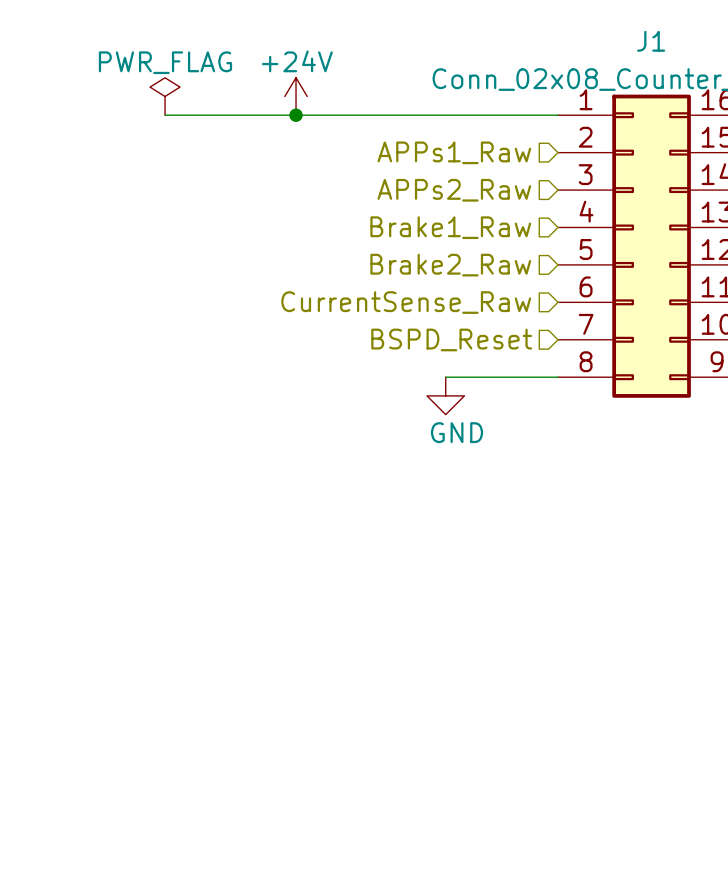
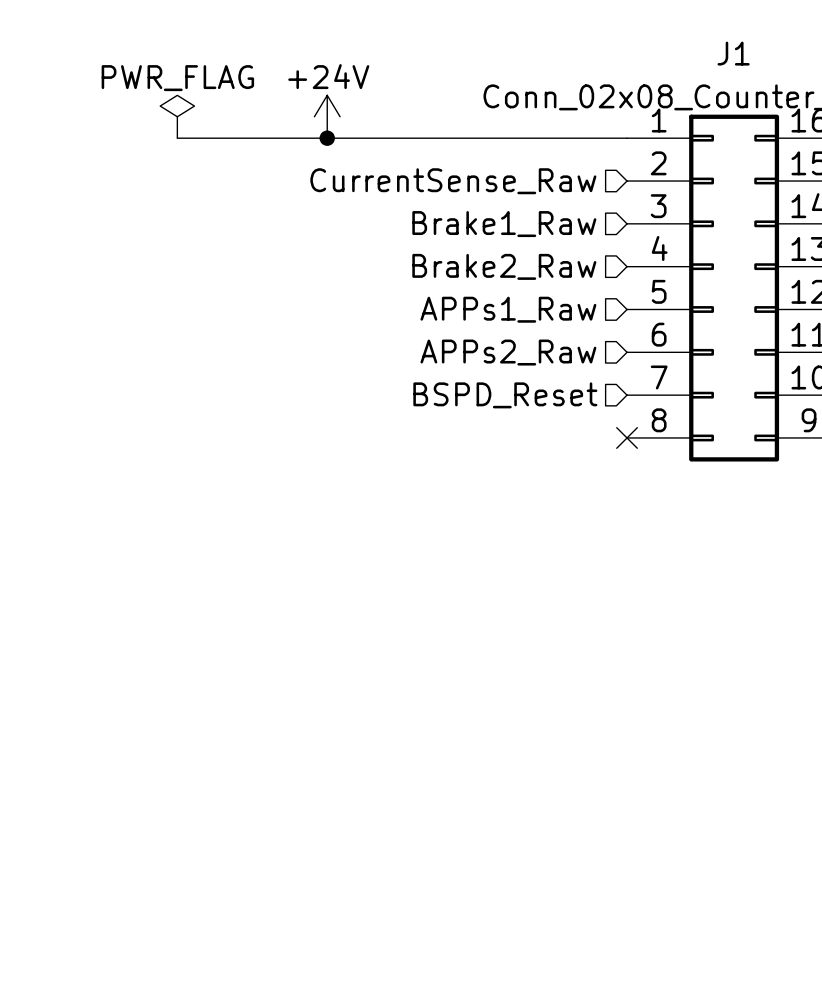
hierarchical label: APPs1_Raw (454, 152) -> CurrentSense_Raw (453, 181)
hierarchical label: APPs2_Raw (454, 190) -> Brake1_Raw (504, 224)
hierarchical label: Brake1_Raw (450, 227) -> Brake2_Raw (504, 266)
hierarchical label: Brake2_Raw (450, 265) -> APPs1_Raw (508, 309)
hierarchical label: CurrentSense_Raw (406, 302) -> APPs2_Raw (508, 352)
wire: (445, 377) (558, 377) -> none
no-connect mark: none -> (627, 437)
power symbol: GND (445, 395) -> none

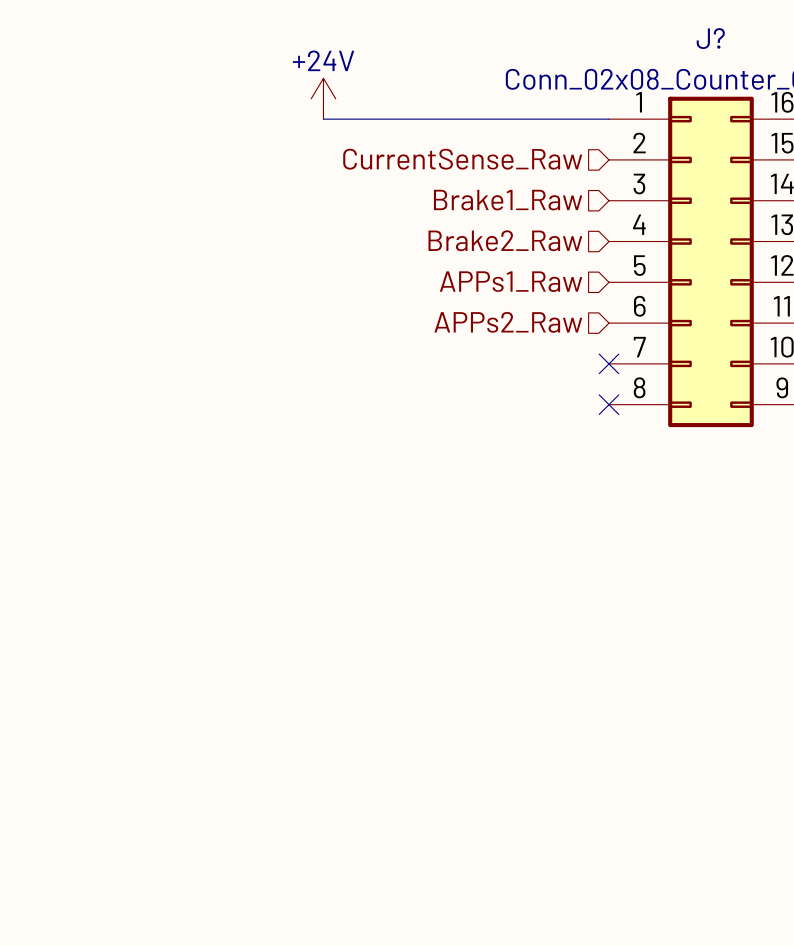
J1 name: J1 (733, 53) -> J? (710, 38)
power symbol: PWR_FLAG (177, 116) -> none
wire: (177, 138) (327, 138) -> none
junction: (327, 138) -> none
hierarchical label: BSPD_Reset (505, 395) -> none
no-connect mark: none -> (609, 363)

